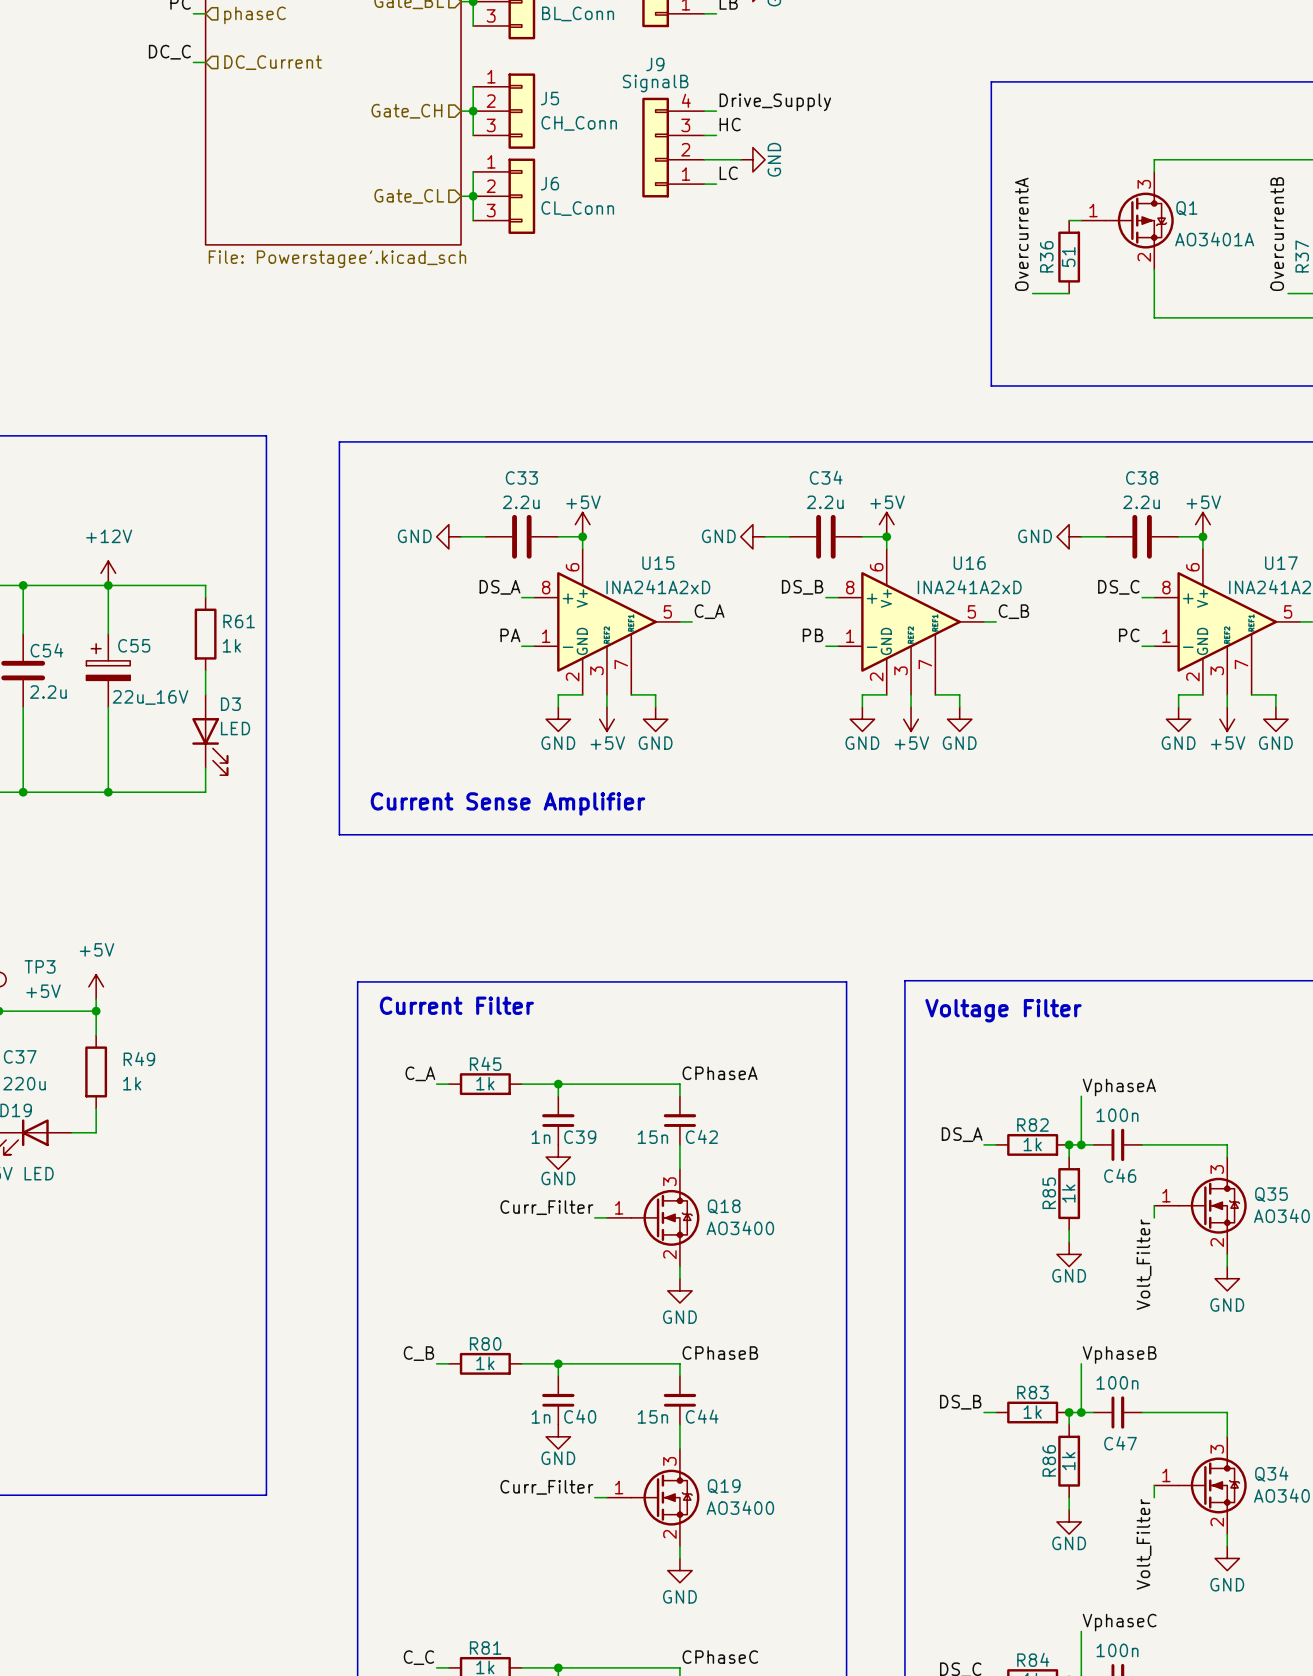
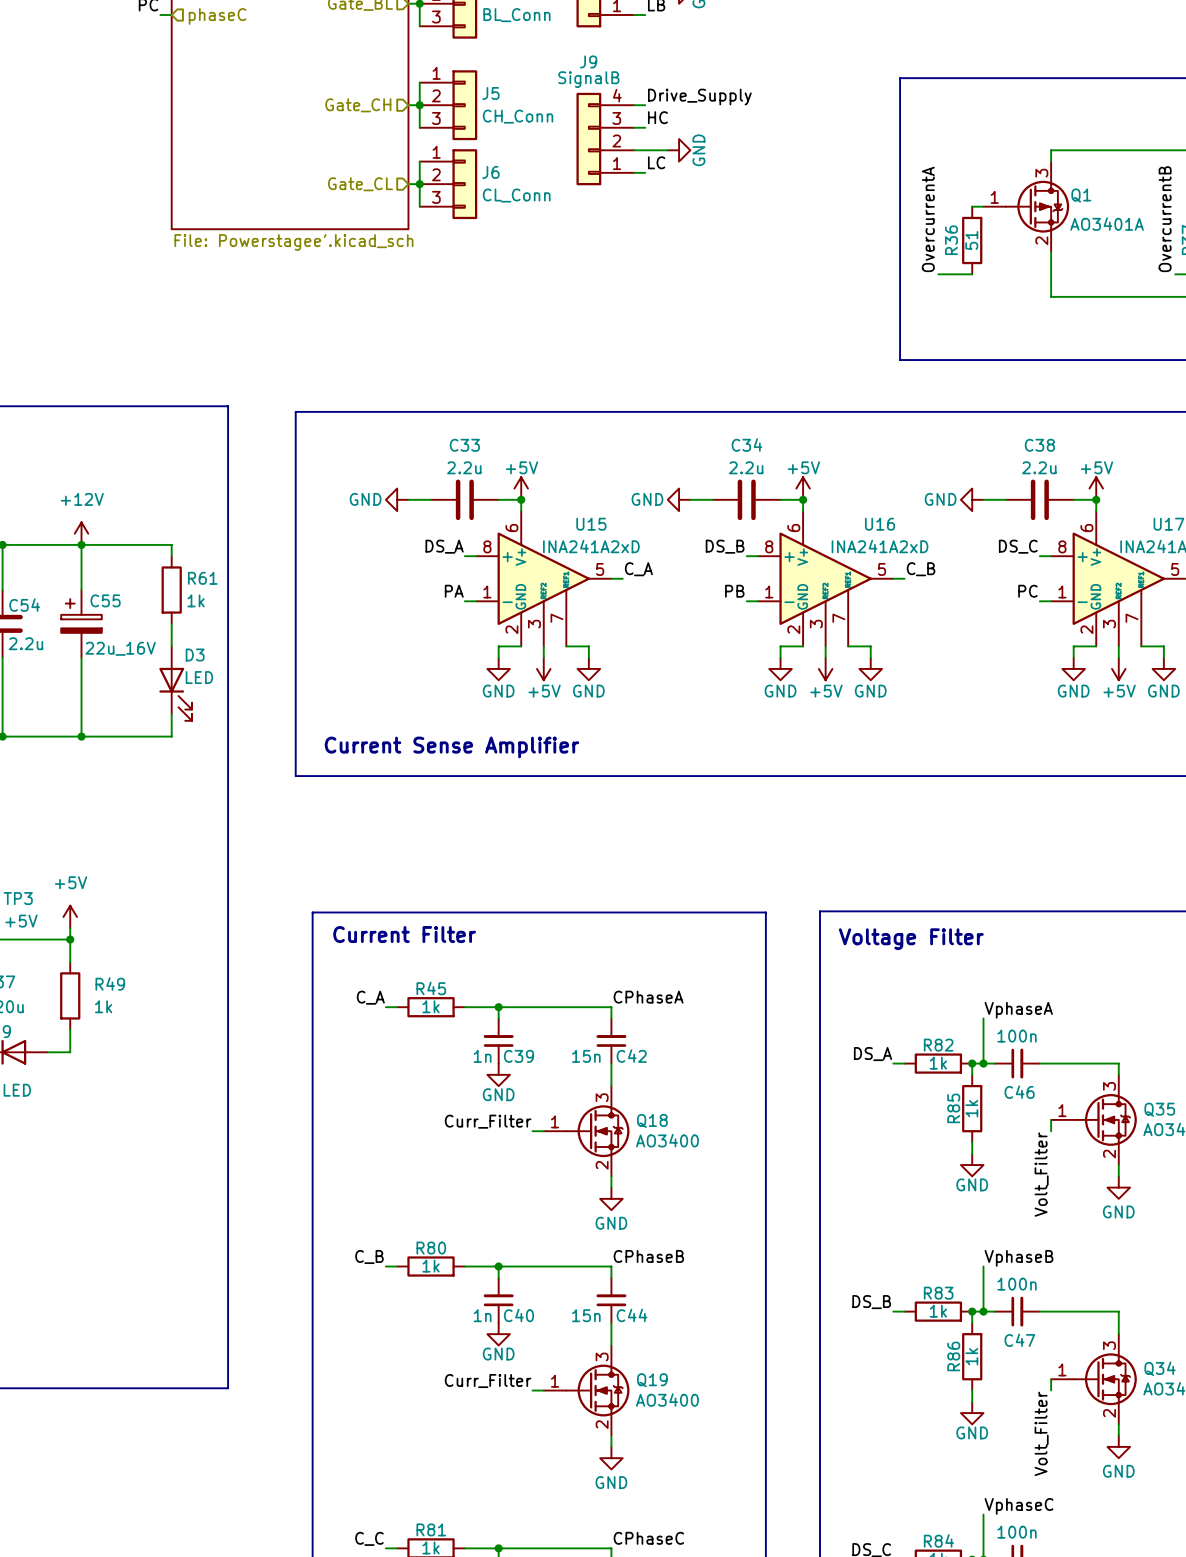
label: DC_C (169, 52) -> none
wire: (193, 62) (205, 62) -> none
hierarchical label: DC_Current (273, 62) -> none

